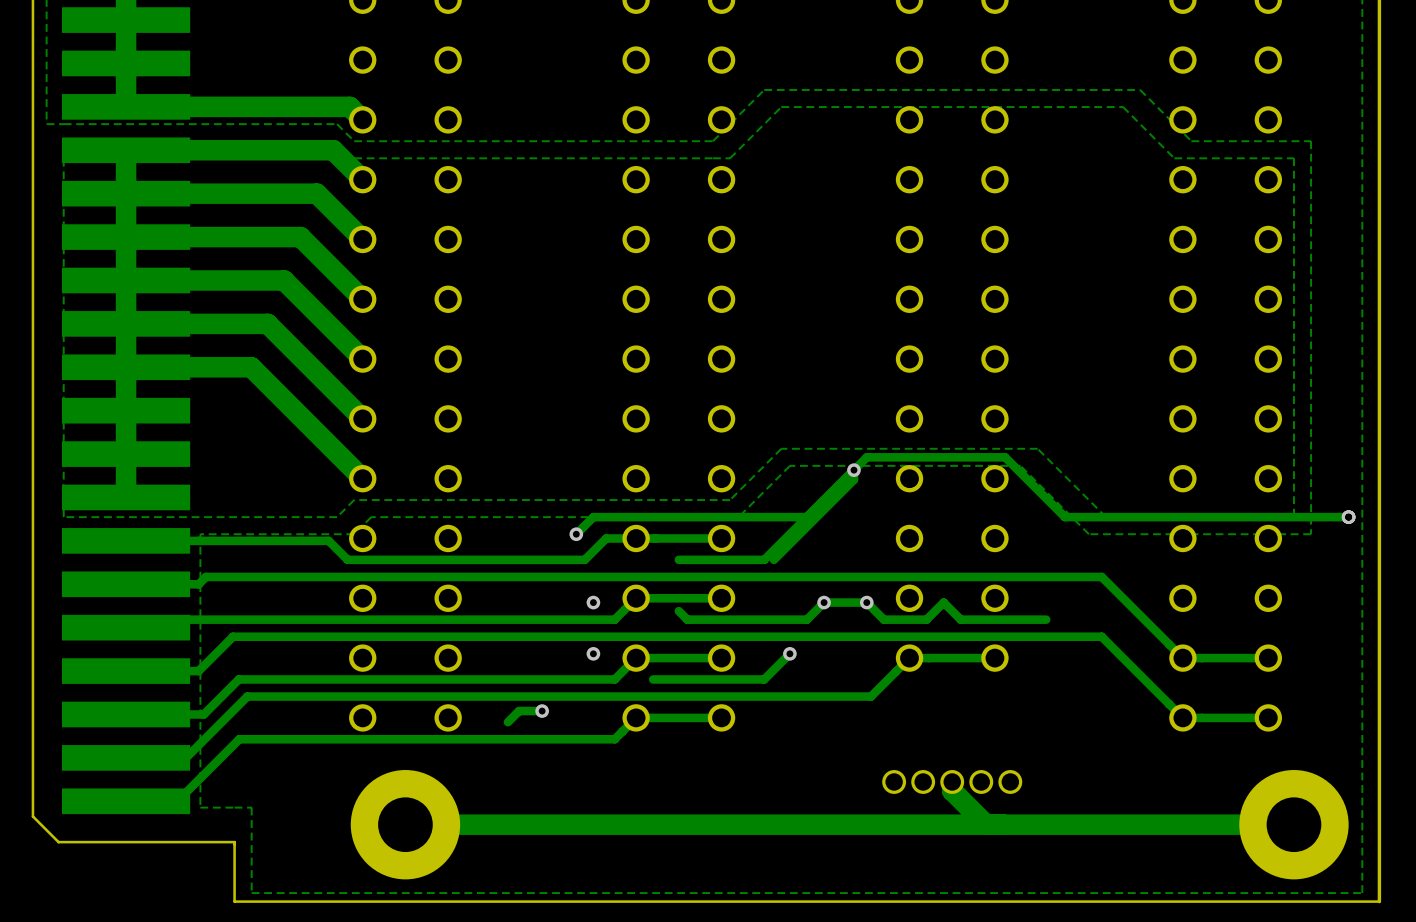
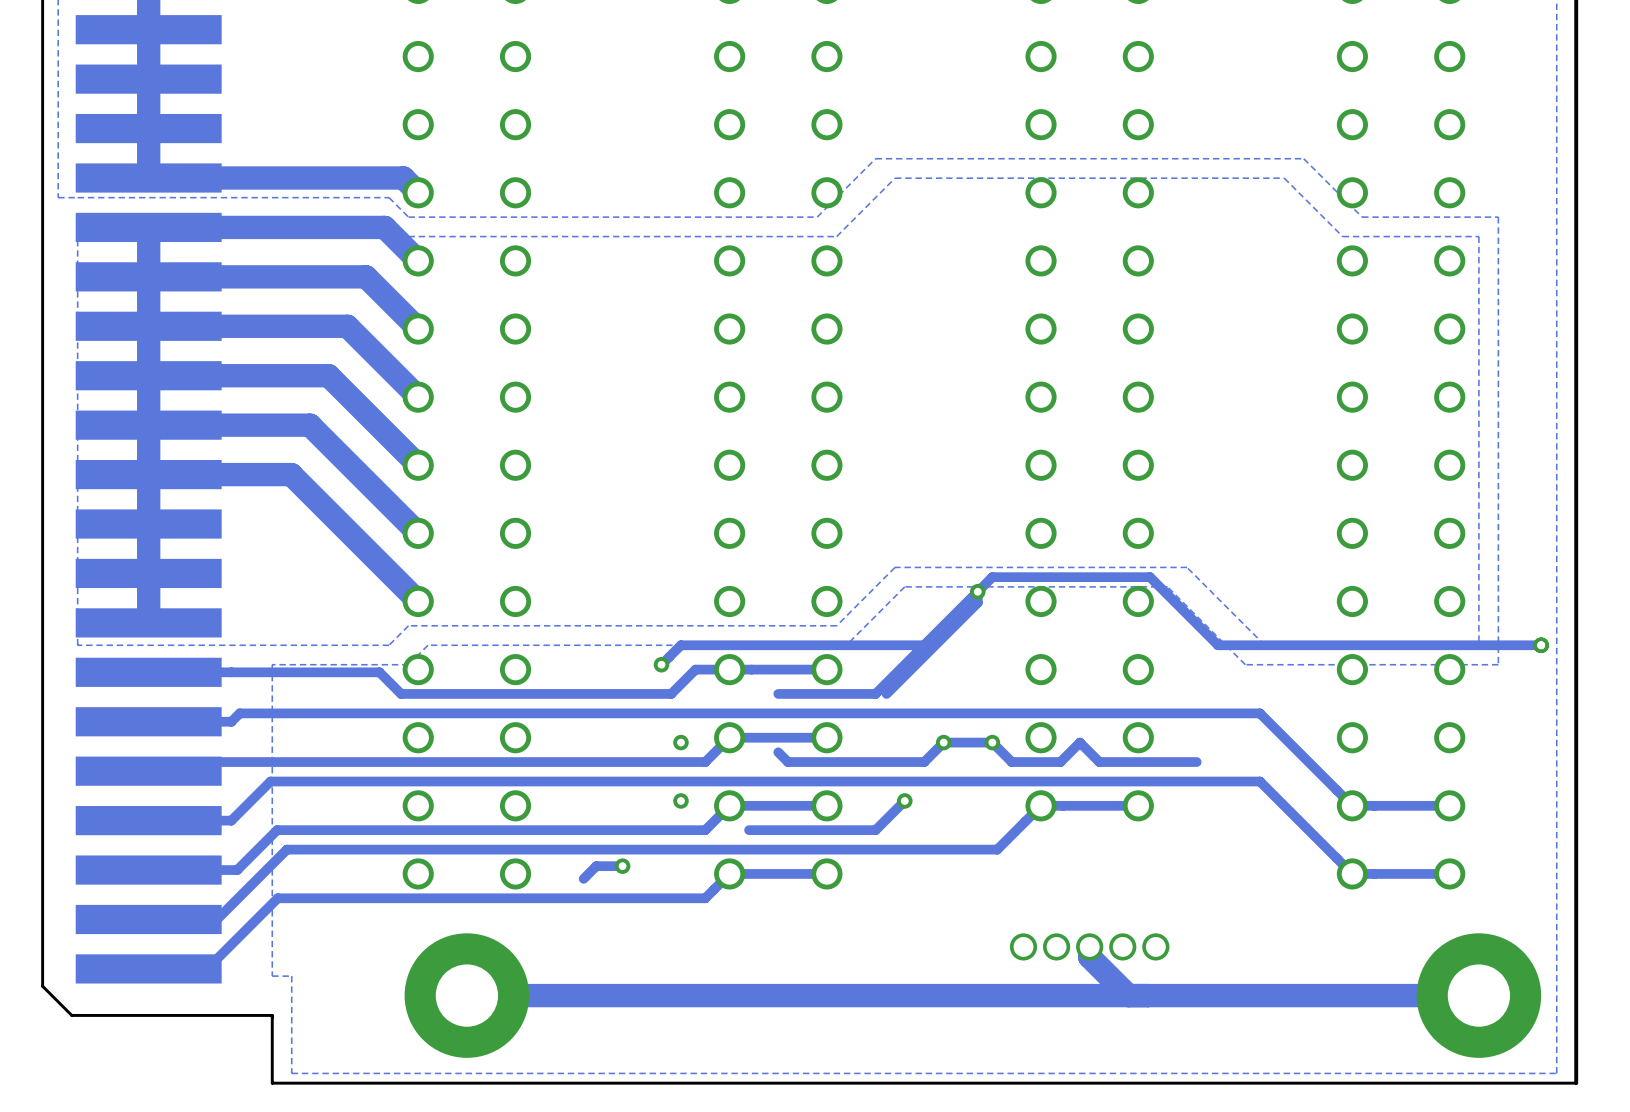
zone outline: (234, 534) (200, 534) (200, 807) (234, 807) -> (272, 664) (272, 976)

